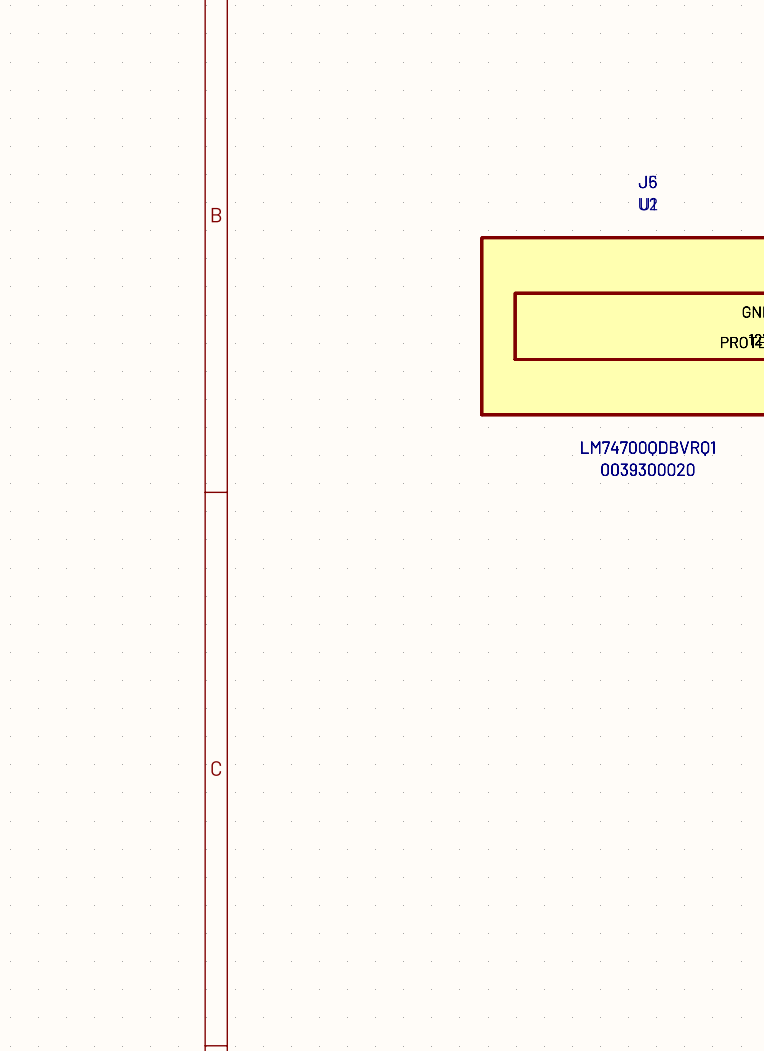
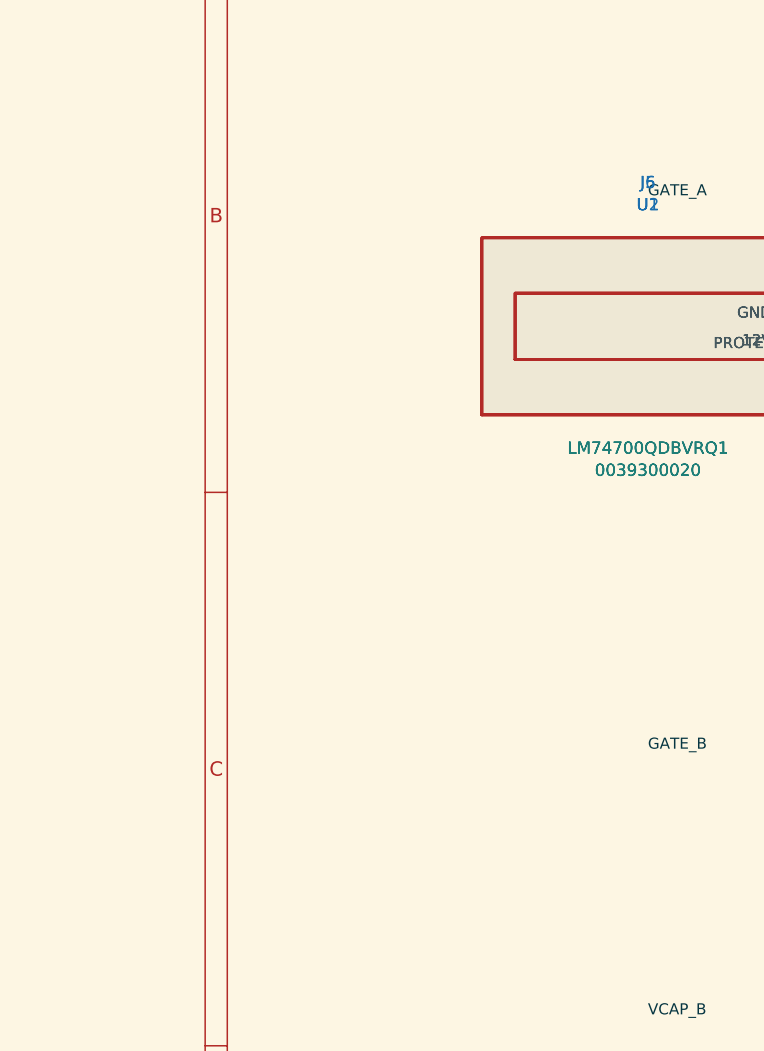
label: none -> GATE_A (677, 191)
label: none -> GATE_B (677, 744)
label: none -> VCAP_B (676, 1010)

